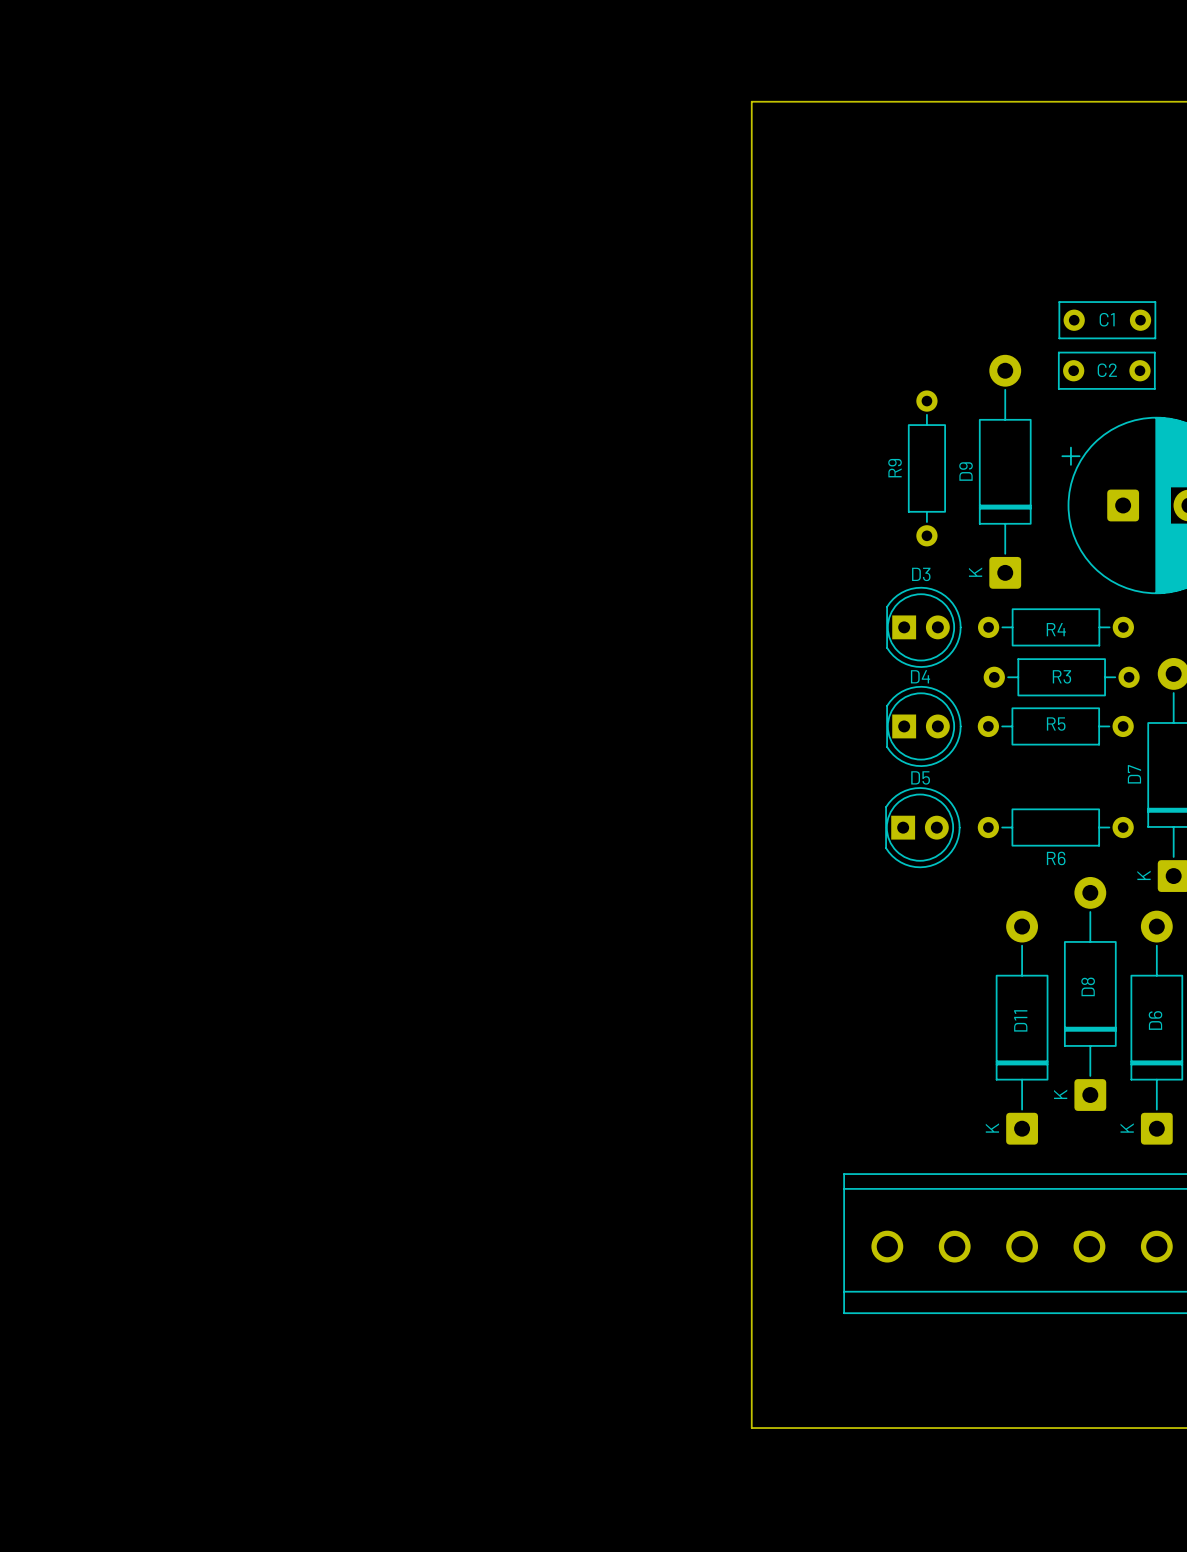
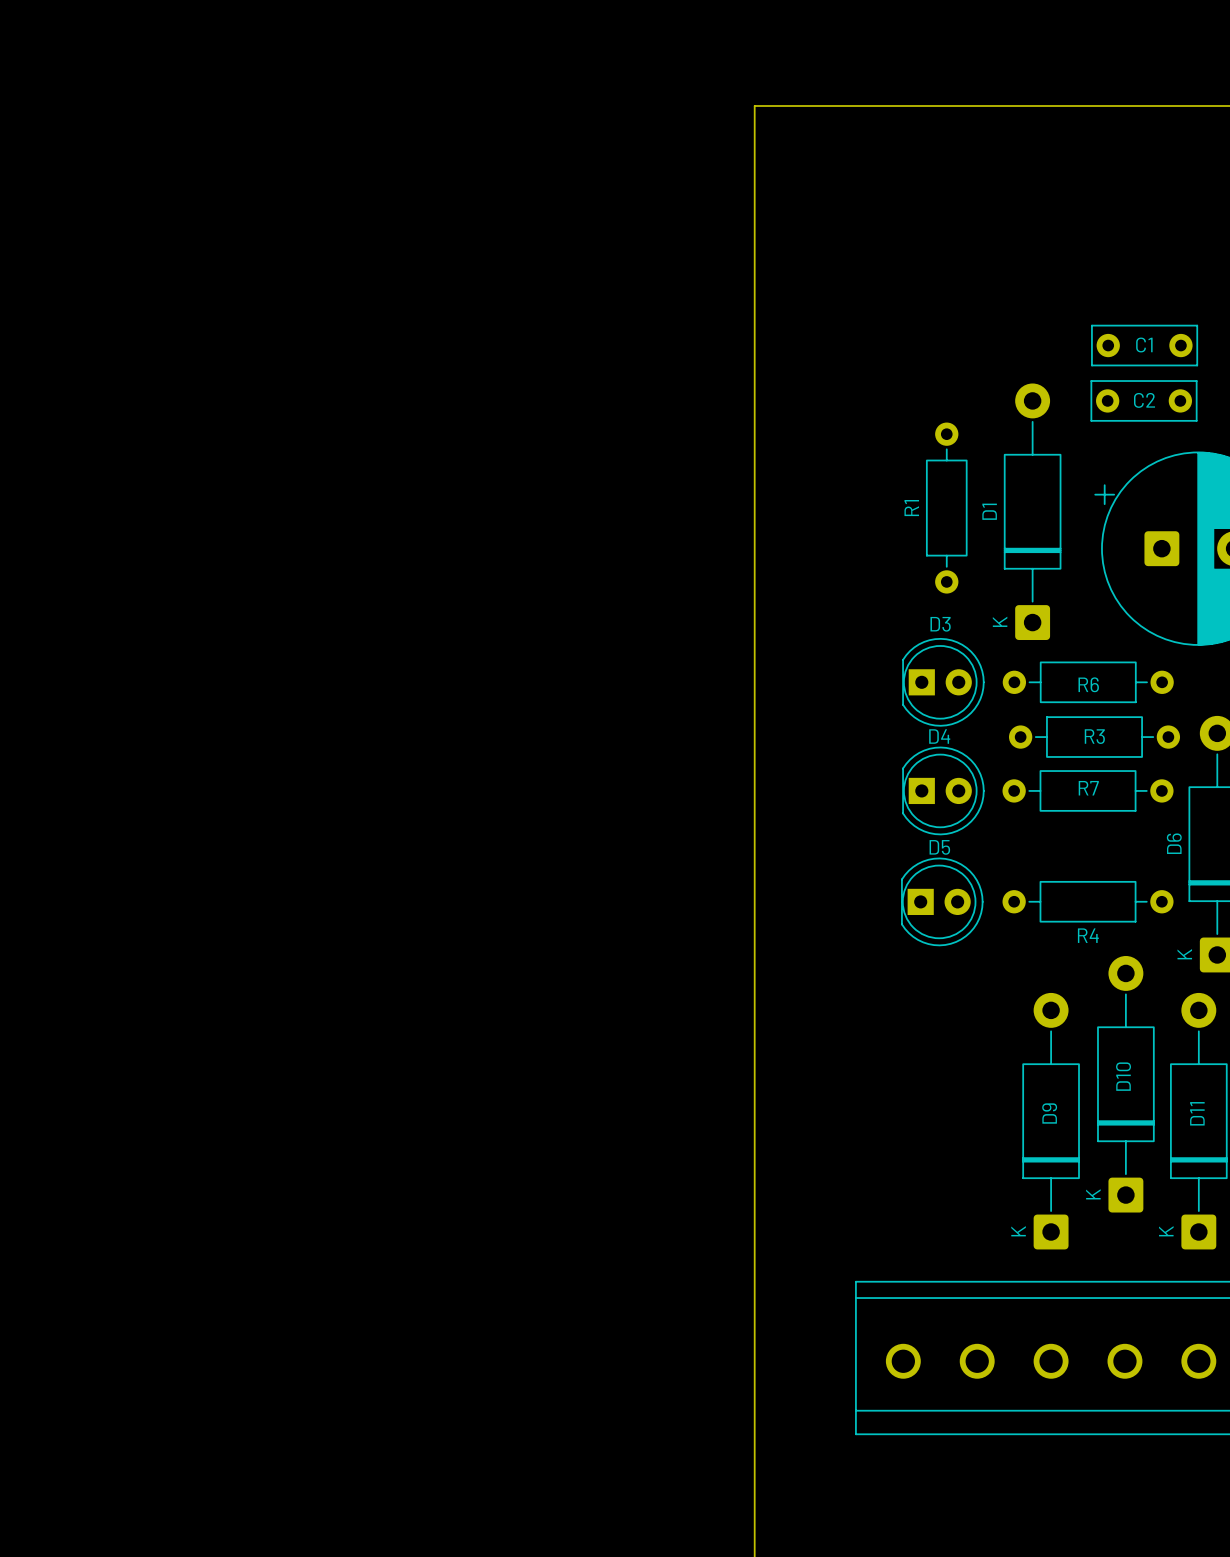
R9 name: R9 (895, 468) -> R1 (911, 508)
D9 name: D9 (966, 471) -> D1 (989, 511)
R4 name: R4 (1056, 629) -> R6 (1088, 684)
R5 name: R5 (1056, 724) -> R7 (1088, 788)
D7 name: D7 (1134, 774) -> D6 (1174, 843)
R6 name: R6 (1056, 858) -> R4 (1088, 935)
D8 name: D8 (1088, 986) -> D10 (1123, 1076)
D11 name: D11 (1020, 1020) -> D9 (1049, 1113)
D6 name: D6 (1155, 1020) -> D11 (1197, 1113)

